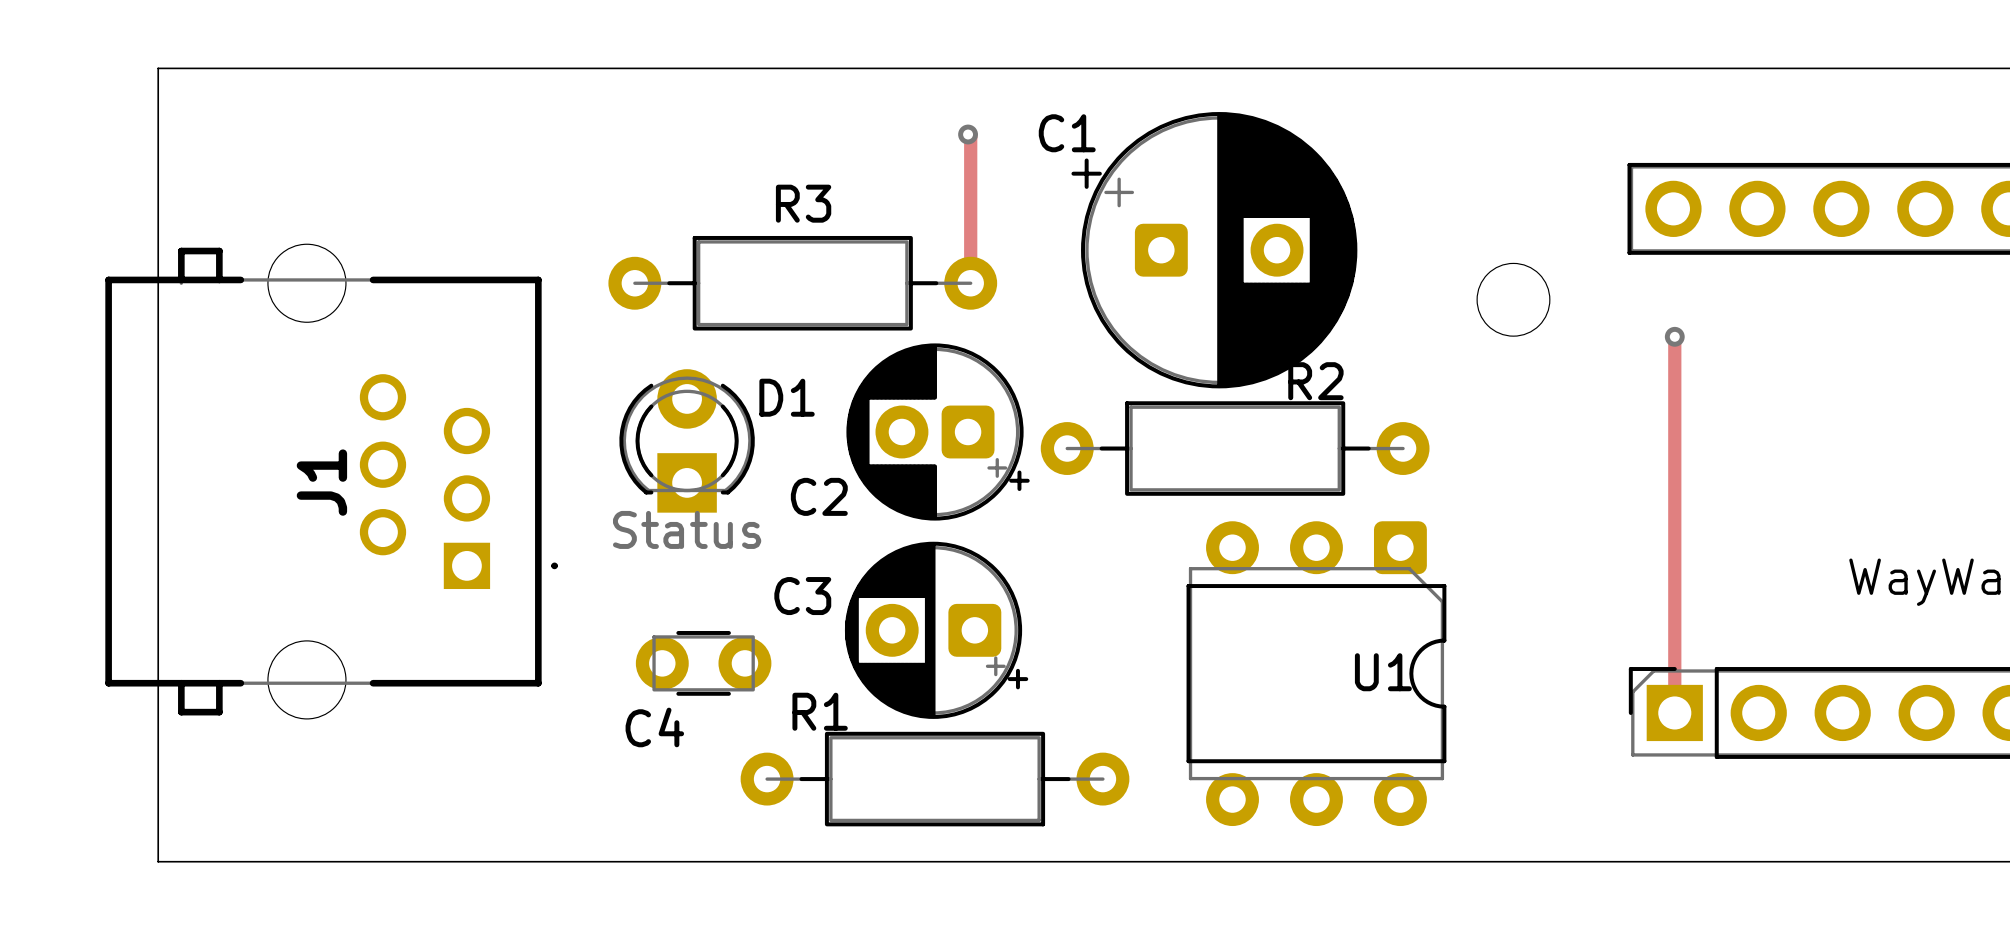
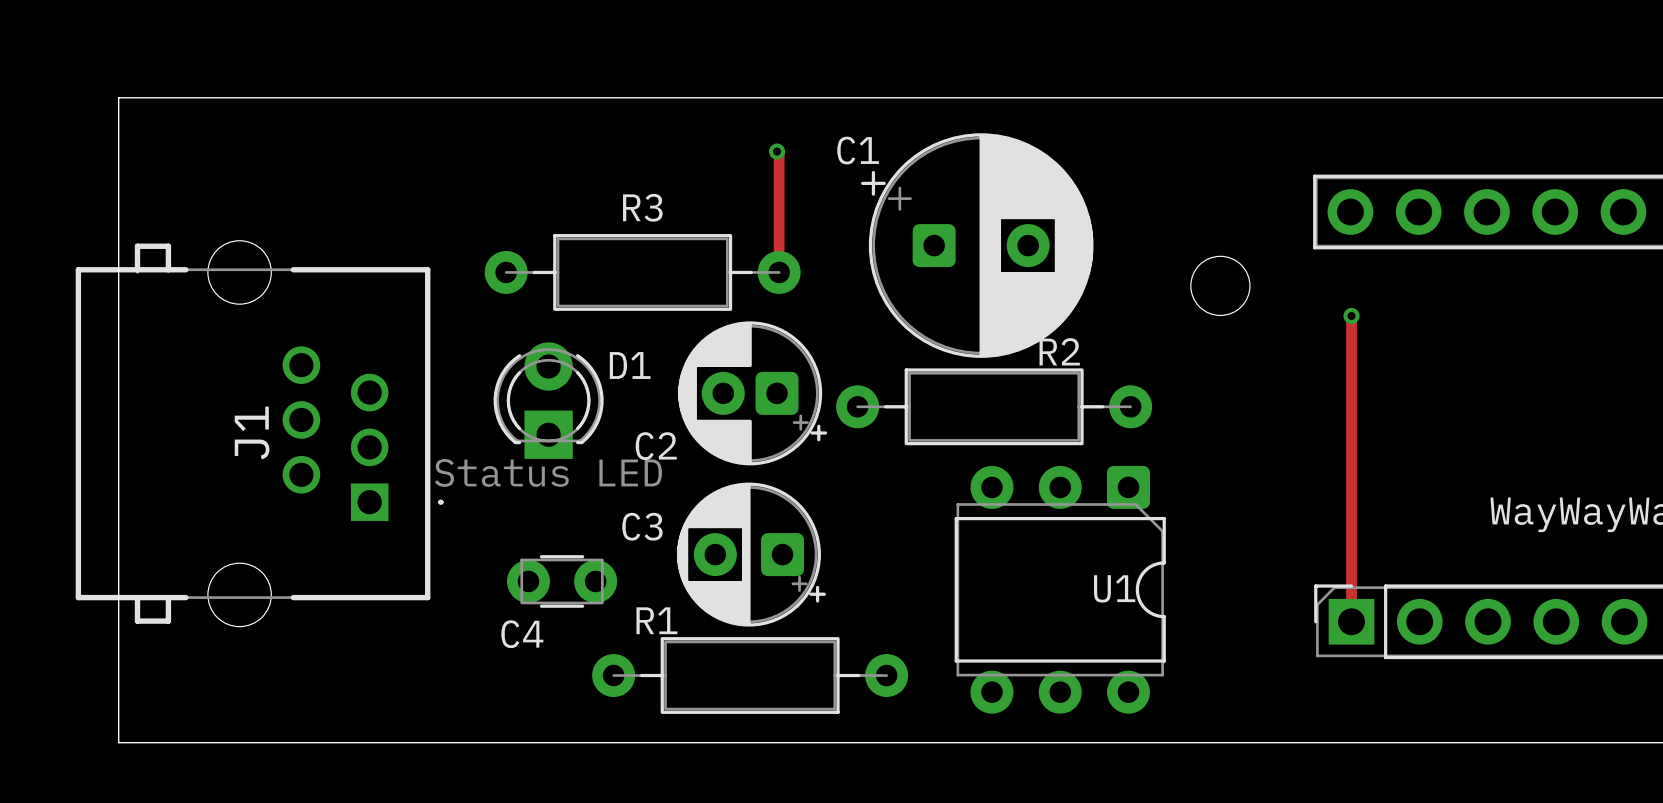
D1 value: Status (687, 529) -> Status LED (548, 472)

